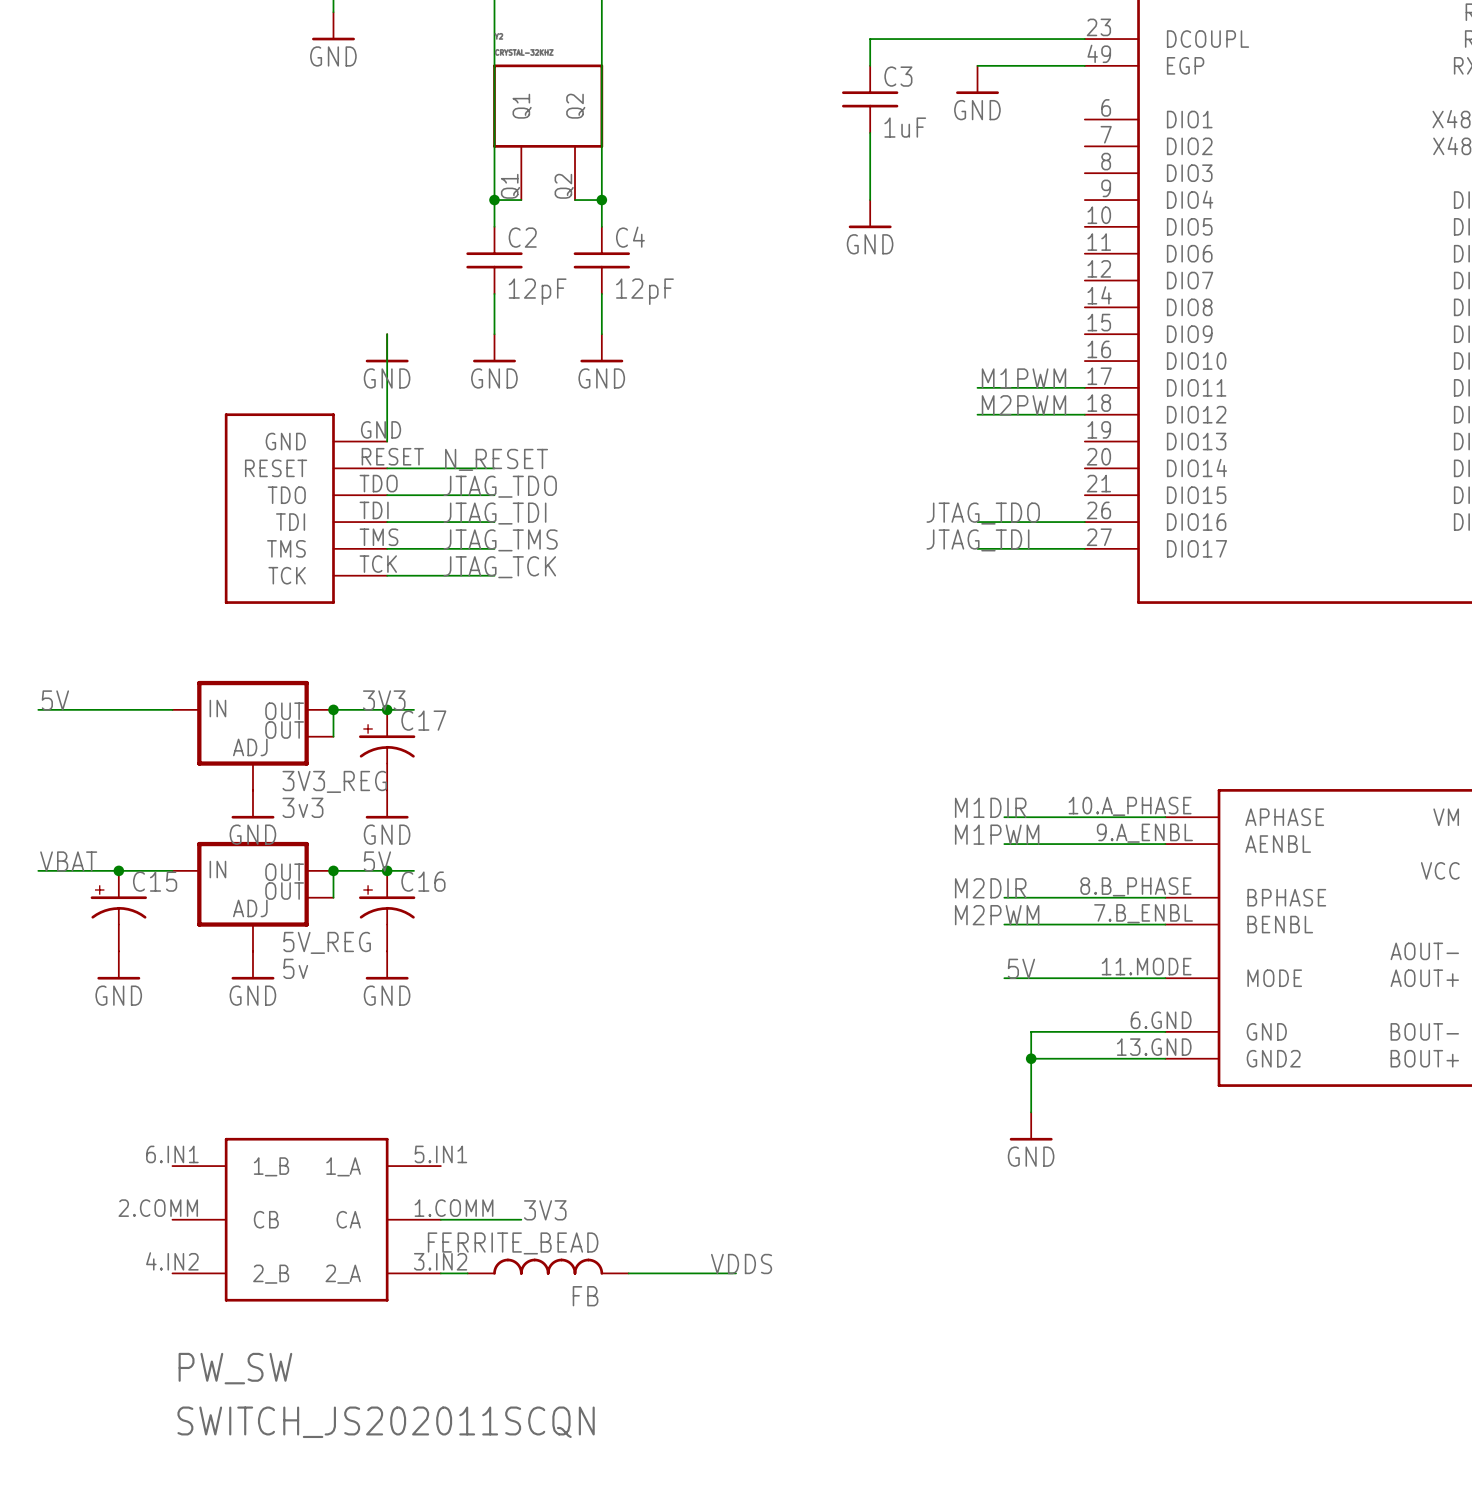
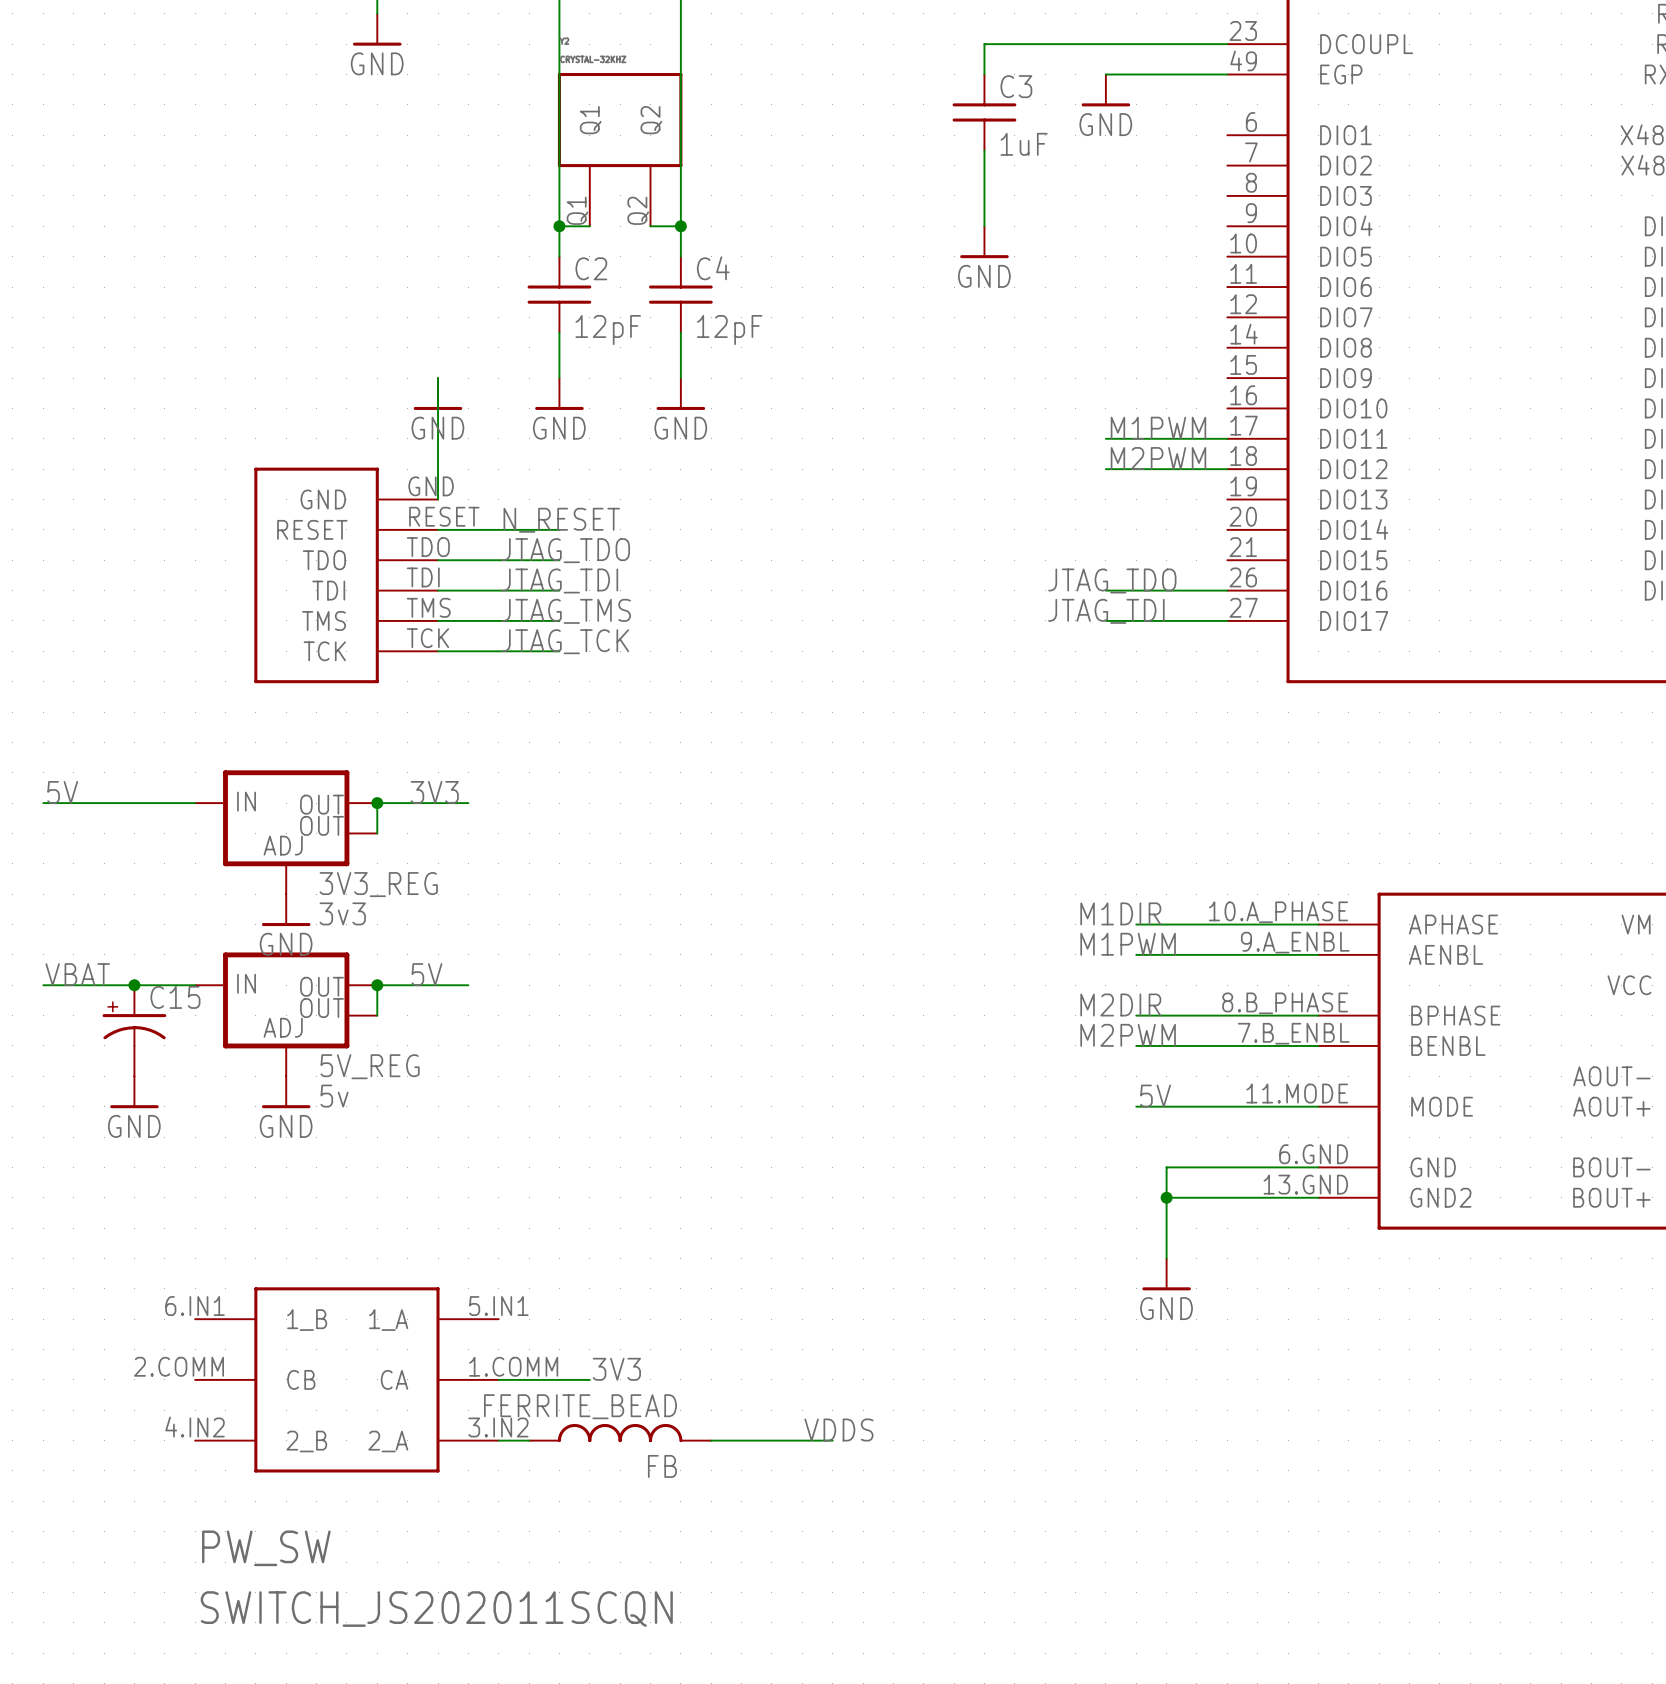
junction: (387, 709) -> none
C17: (387, 750) -> none
power symbol: GND (387, 804) -> none
junction: (387, 870) -> none
C16: (387, 911) -> none
power symbol: GND (387, 965) -> none

